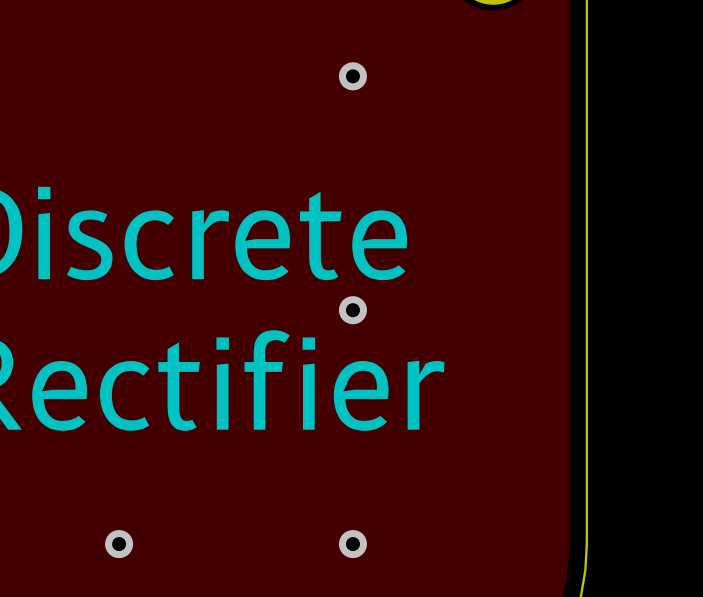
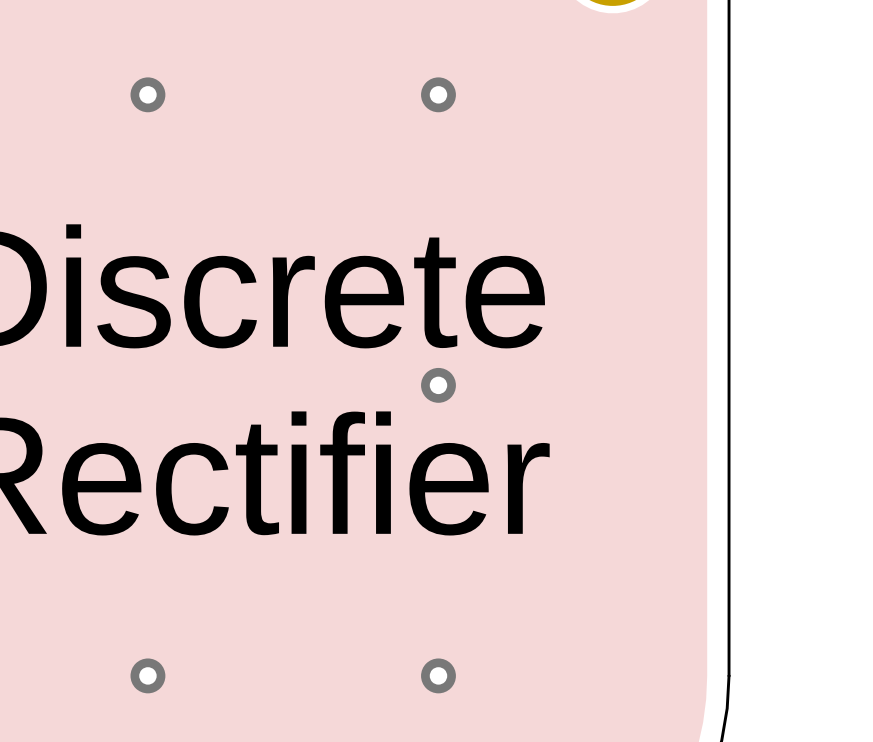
via: none -> (147, 94)

